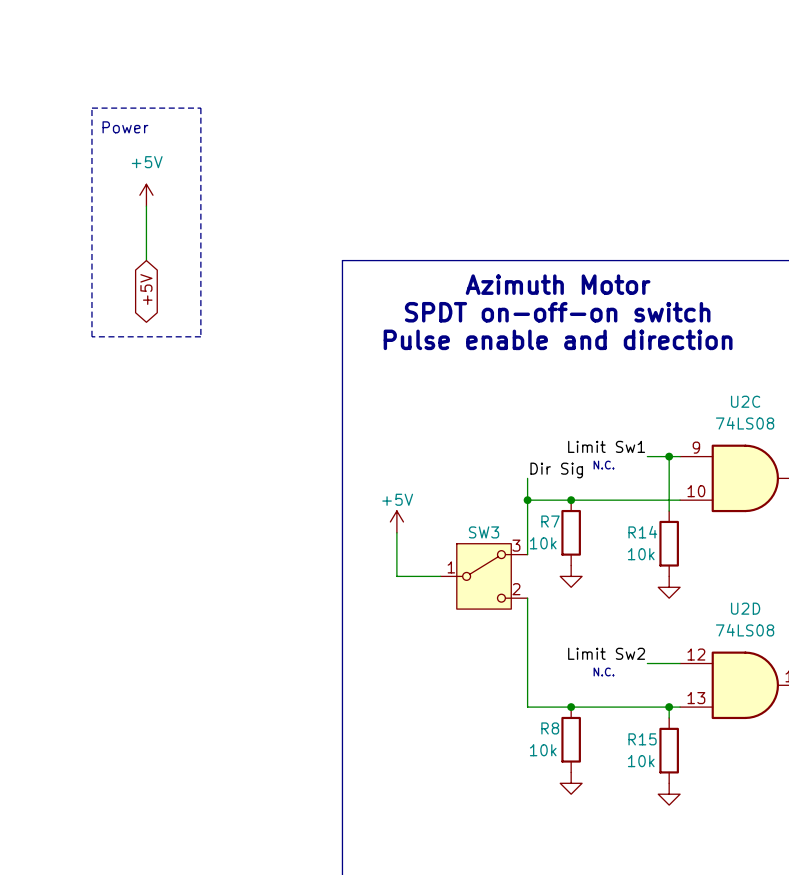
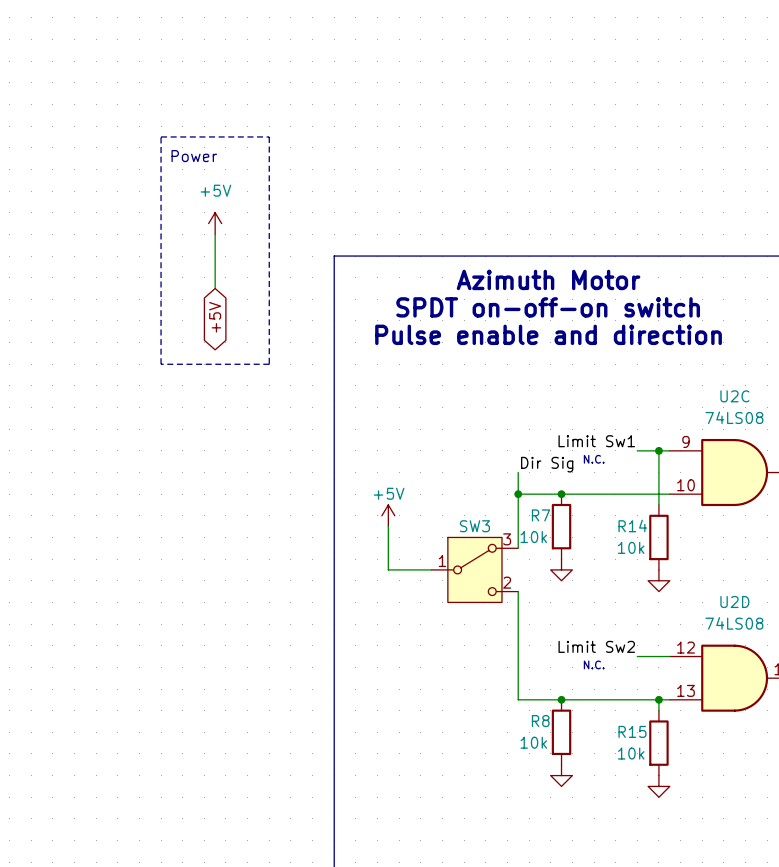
line: (91, 108) (200, 108) (200, 336) (91, 336) (91, 108) -> (161, 136) (269, 136) (269, 364) (161, 364) (161, 136)
text position: Power (125, 127) -> Power (194, 156)
power symbol position: +5V (146, 195) -> +5V (215, 223)
wire: (146, 206) (146, 260) -> (215, 234) (215, 288)
global label position: +5V (146, 289) -> +5V (215, 317)

